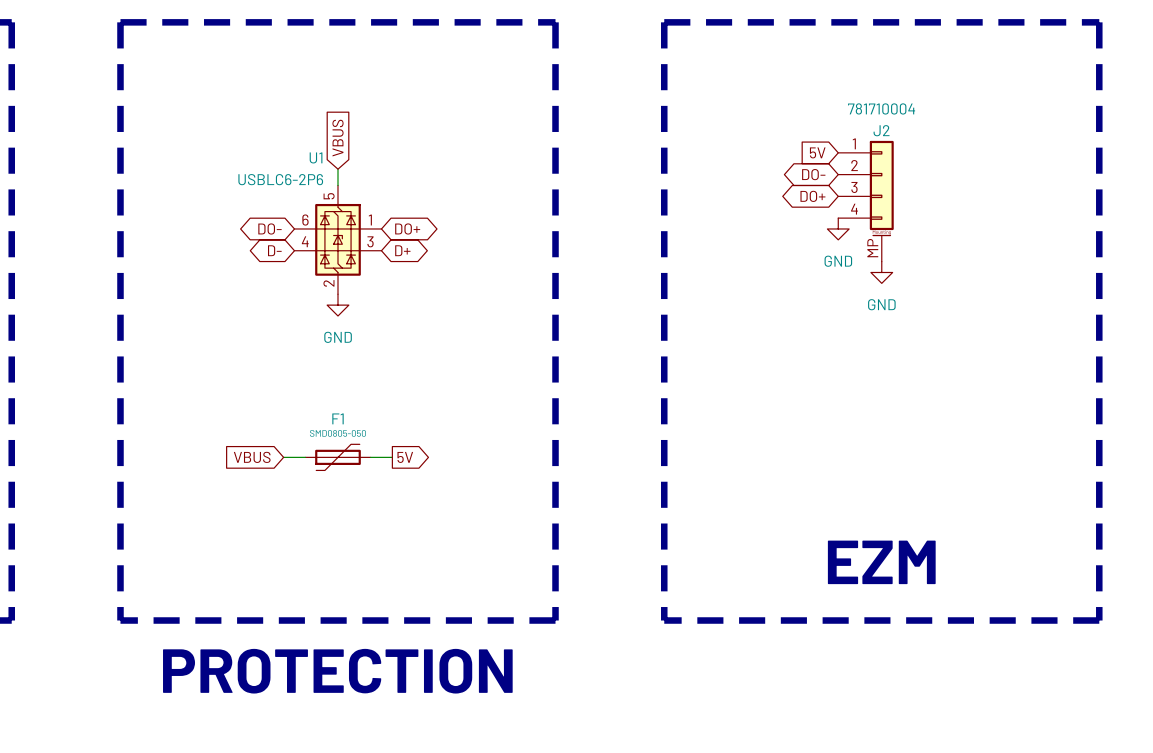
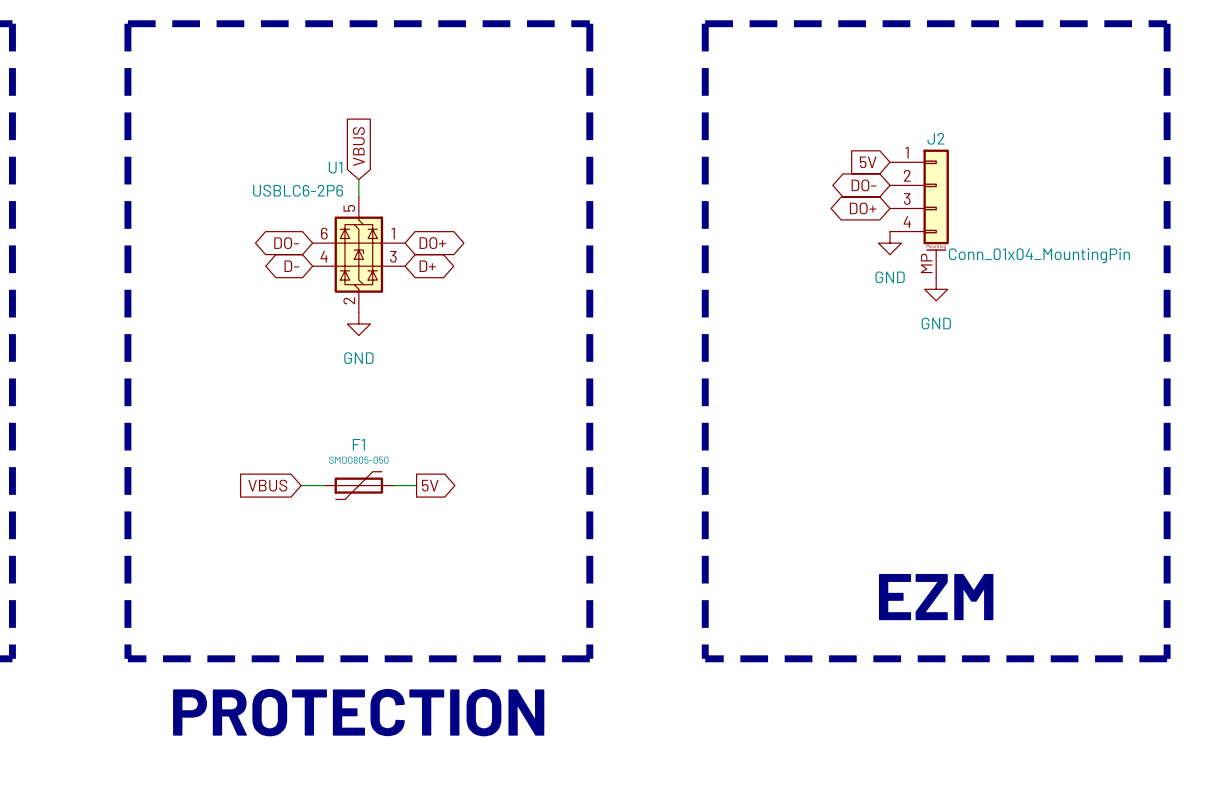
J2 value: 781710004 (881, 108) -> Conn_01x04_MountingPin (1039, 255)

